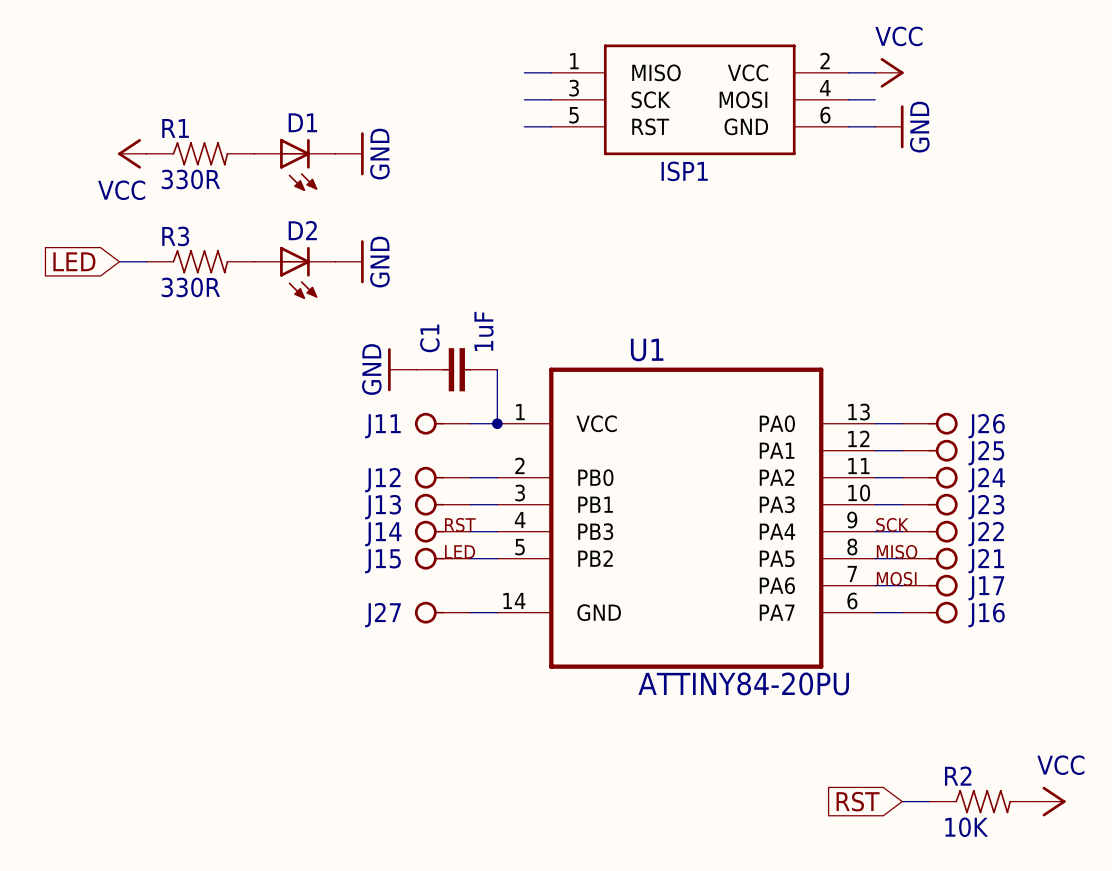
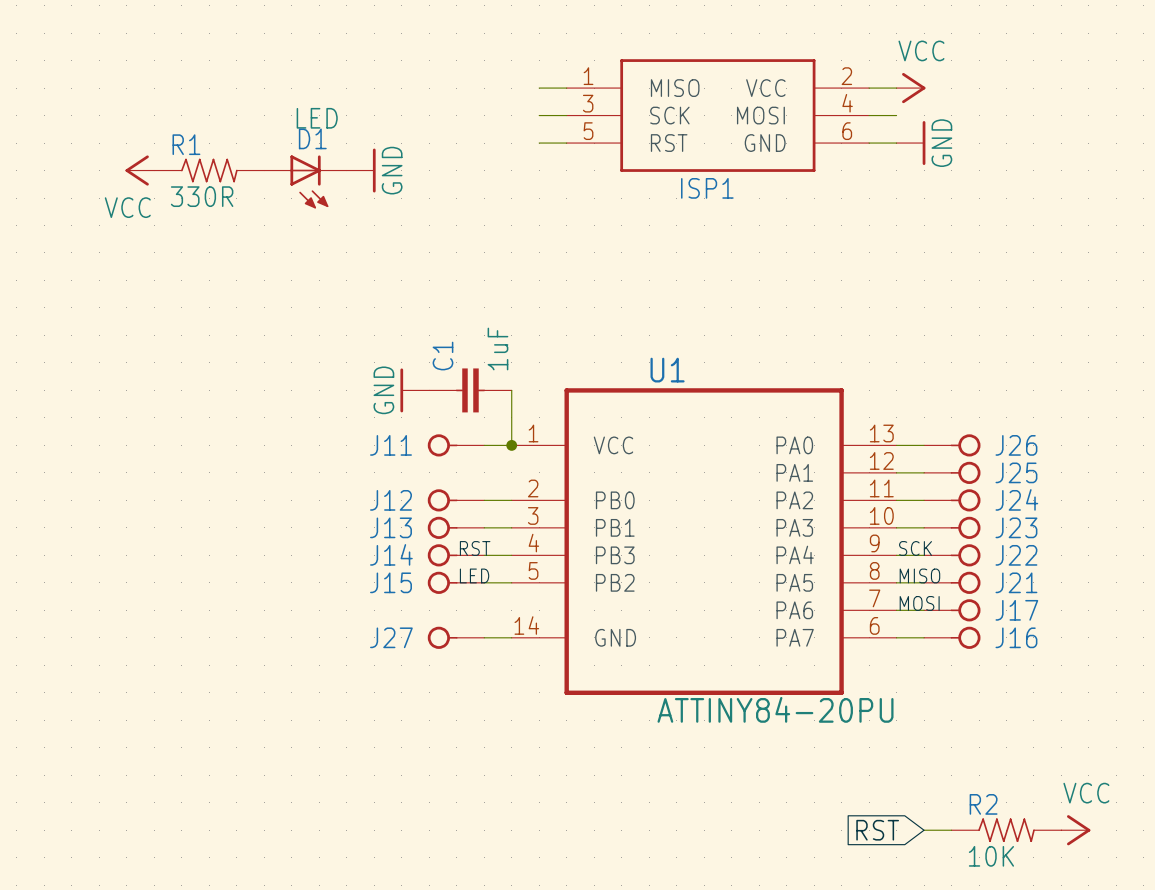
D1 value: none -> LED (317, 118)
global label: LED (74, 261) -> none
wire: (119, 261) (146, 261) -> none
R3: 330R (200, 261) -> none
power symbol: GND (349, 261) -> none
D2: (294, 272) -> none

